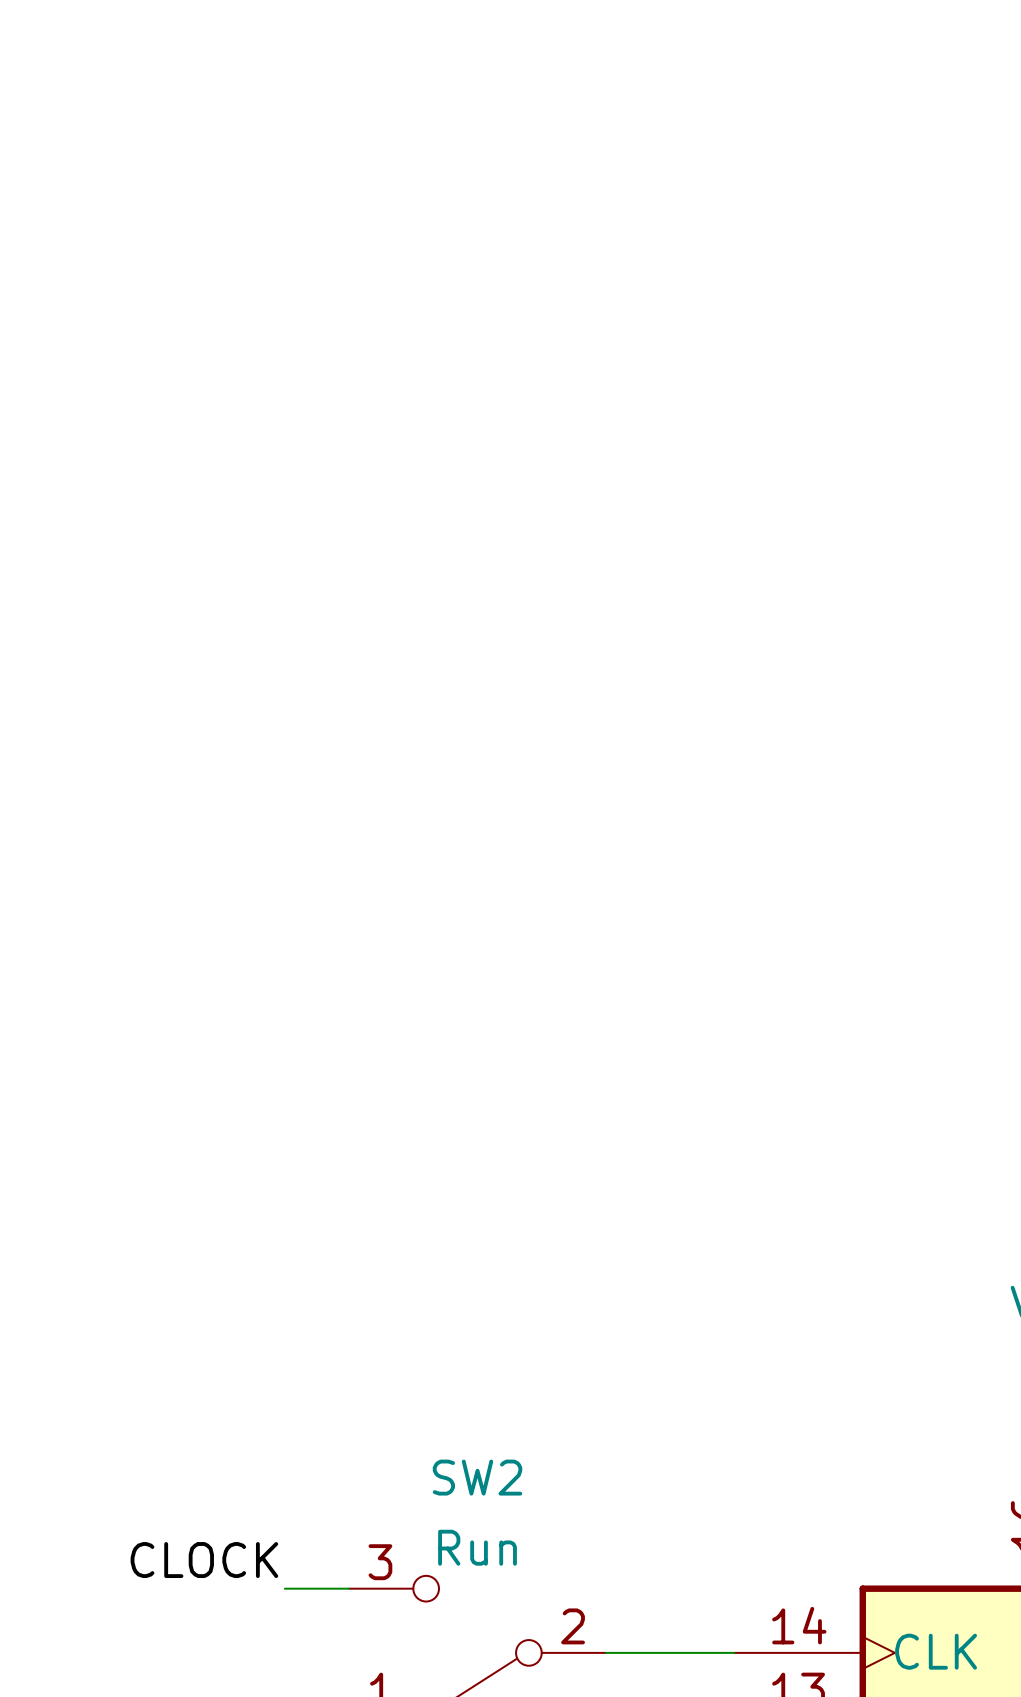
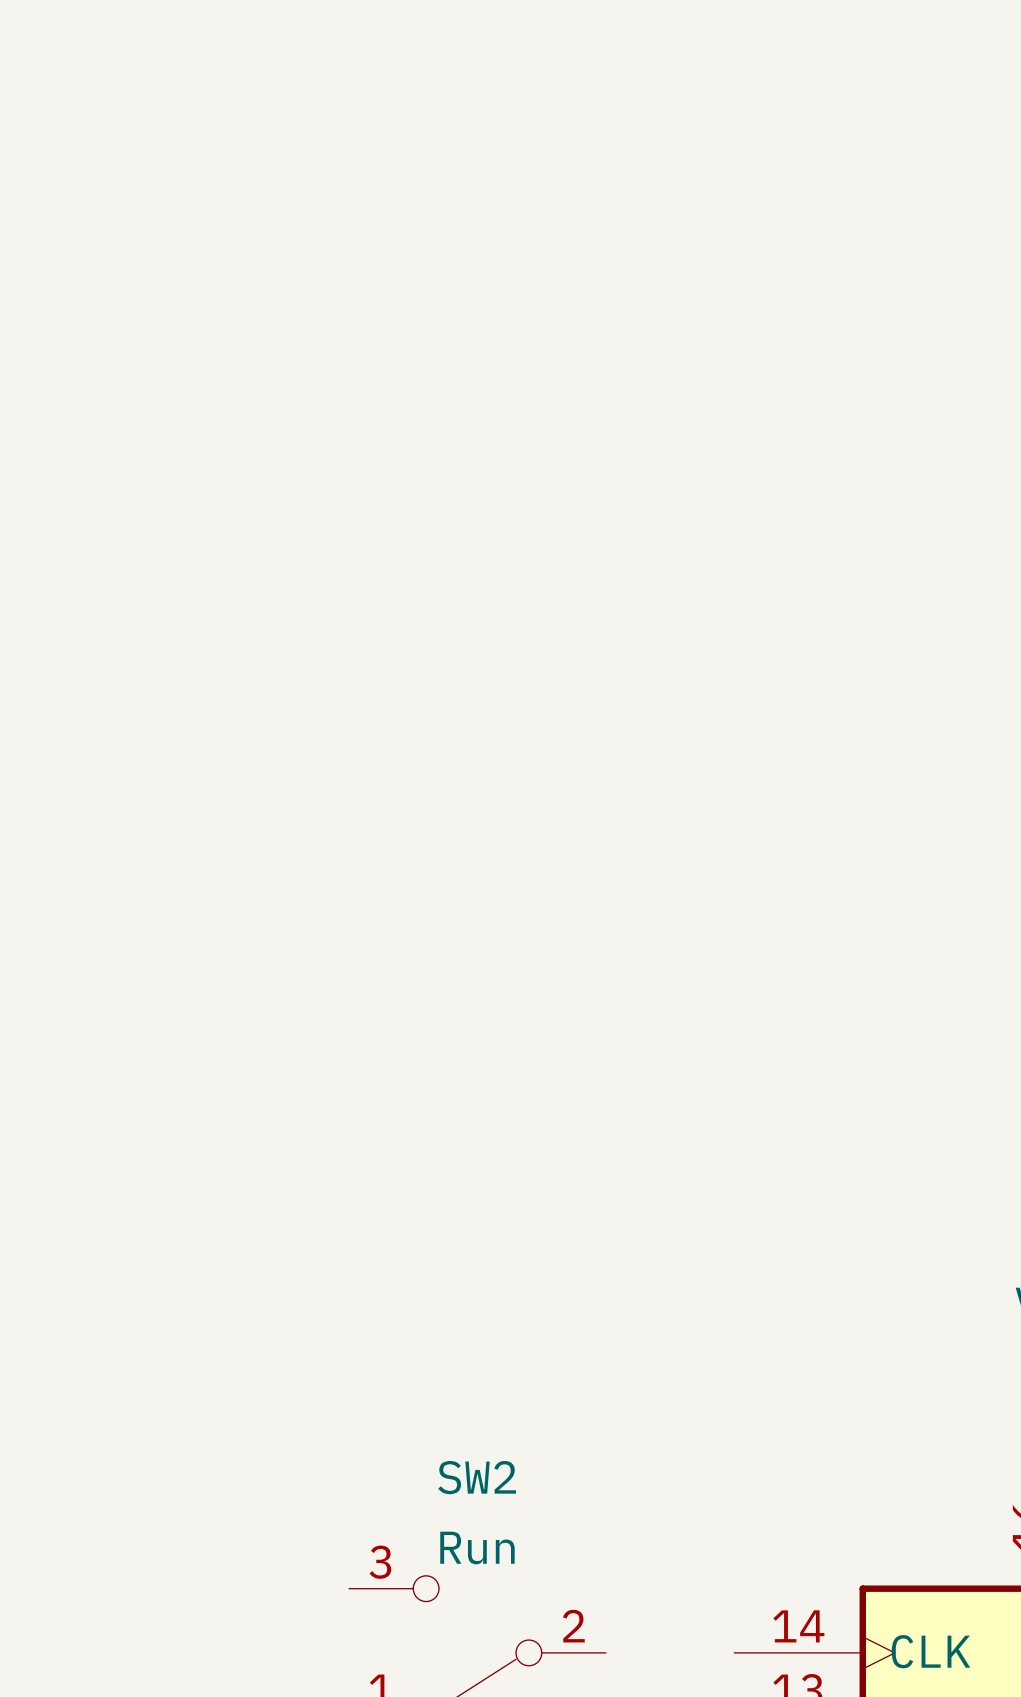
label: CLOCK (204, 1560) -> none
wire: (284, 1588) (349, 1588) -> none
wire: (605, 1652) (734, 1652) -> none

